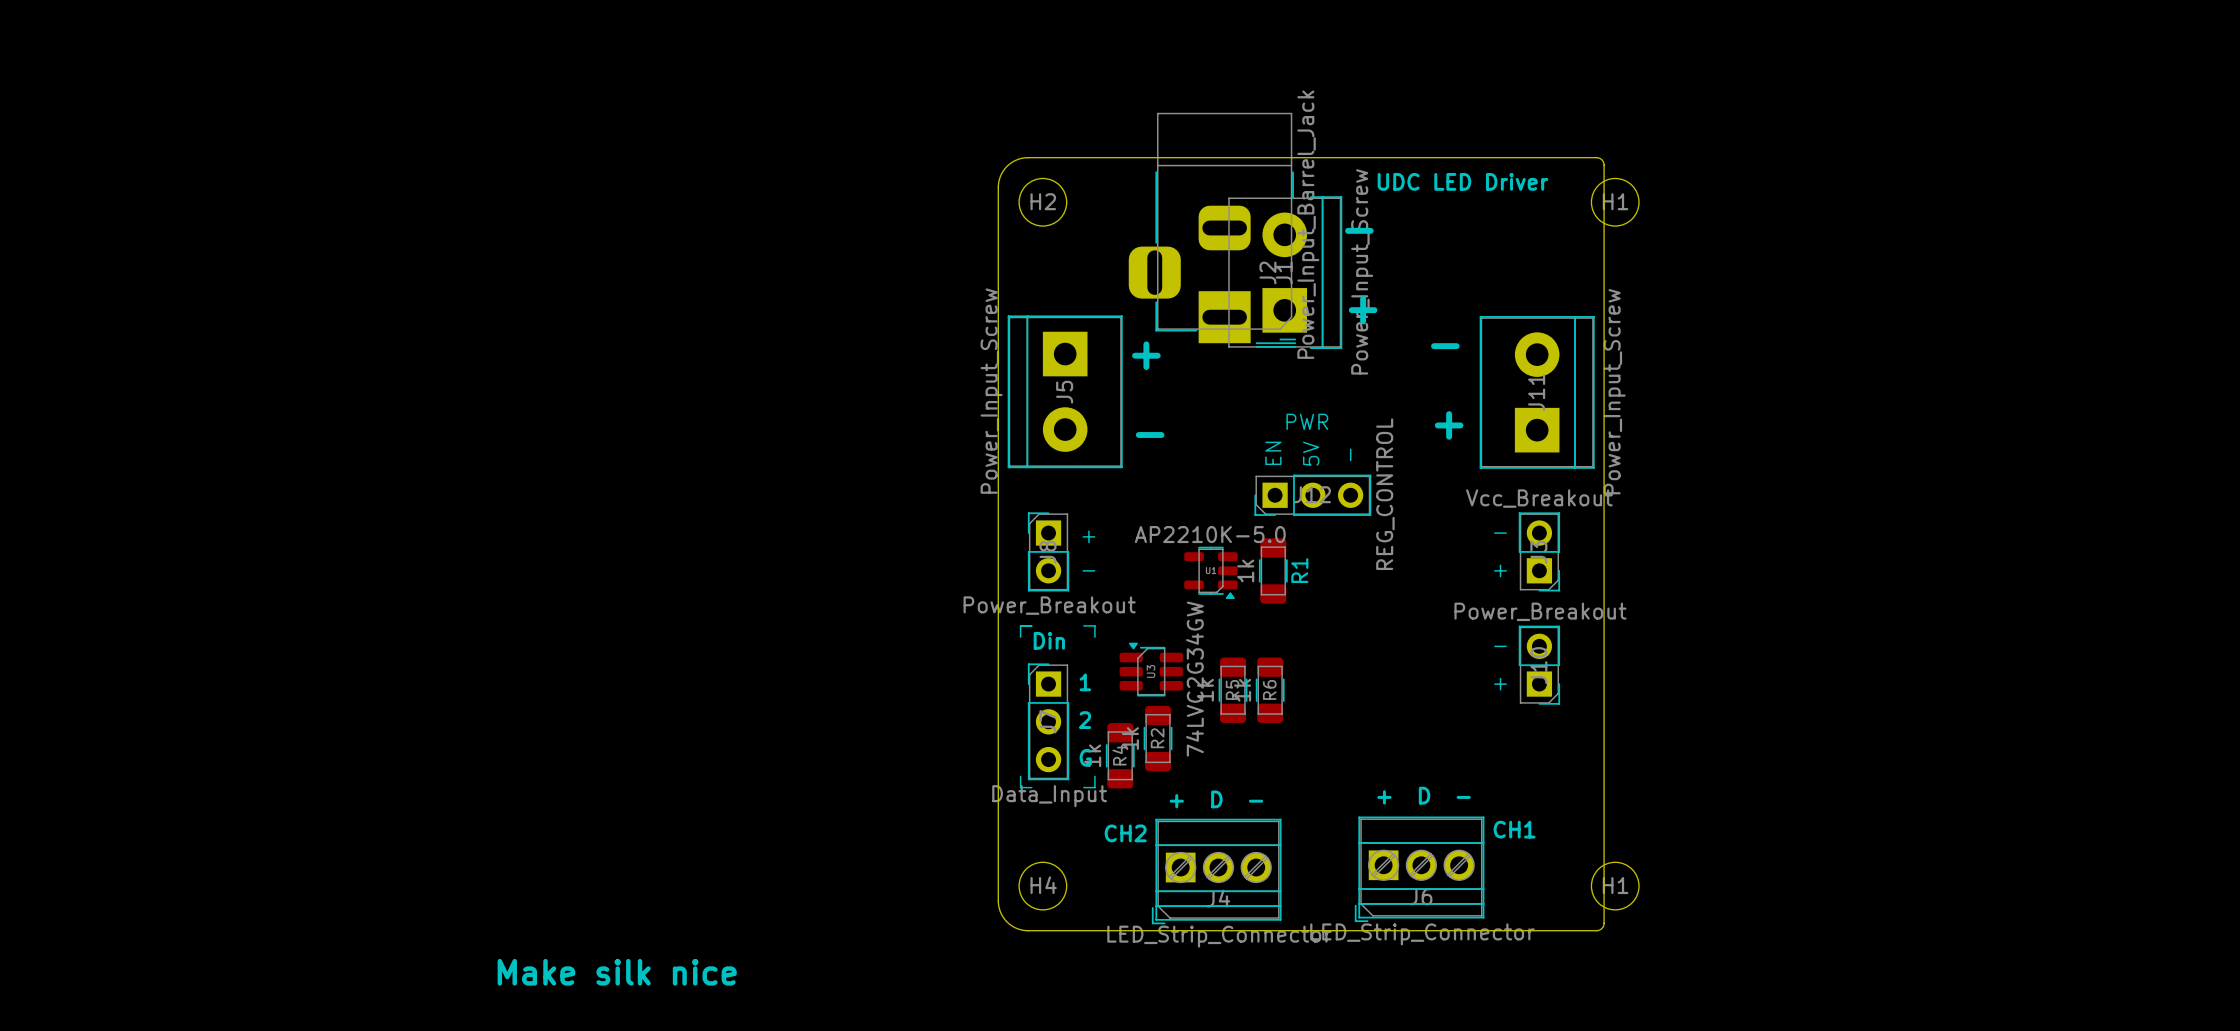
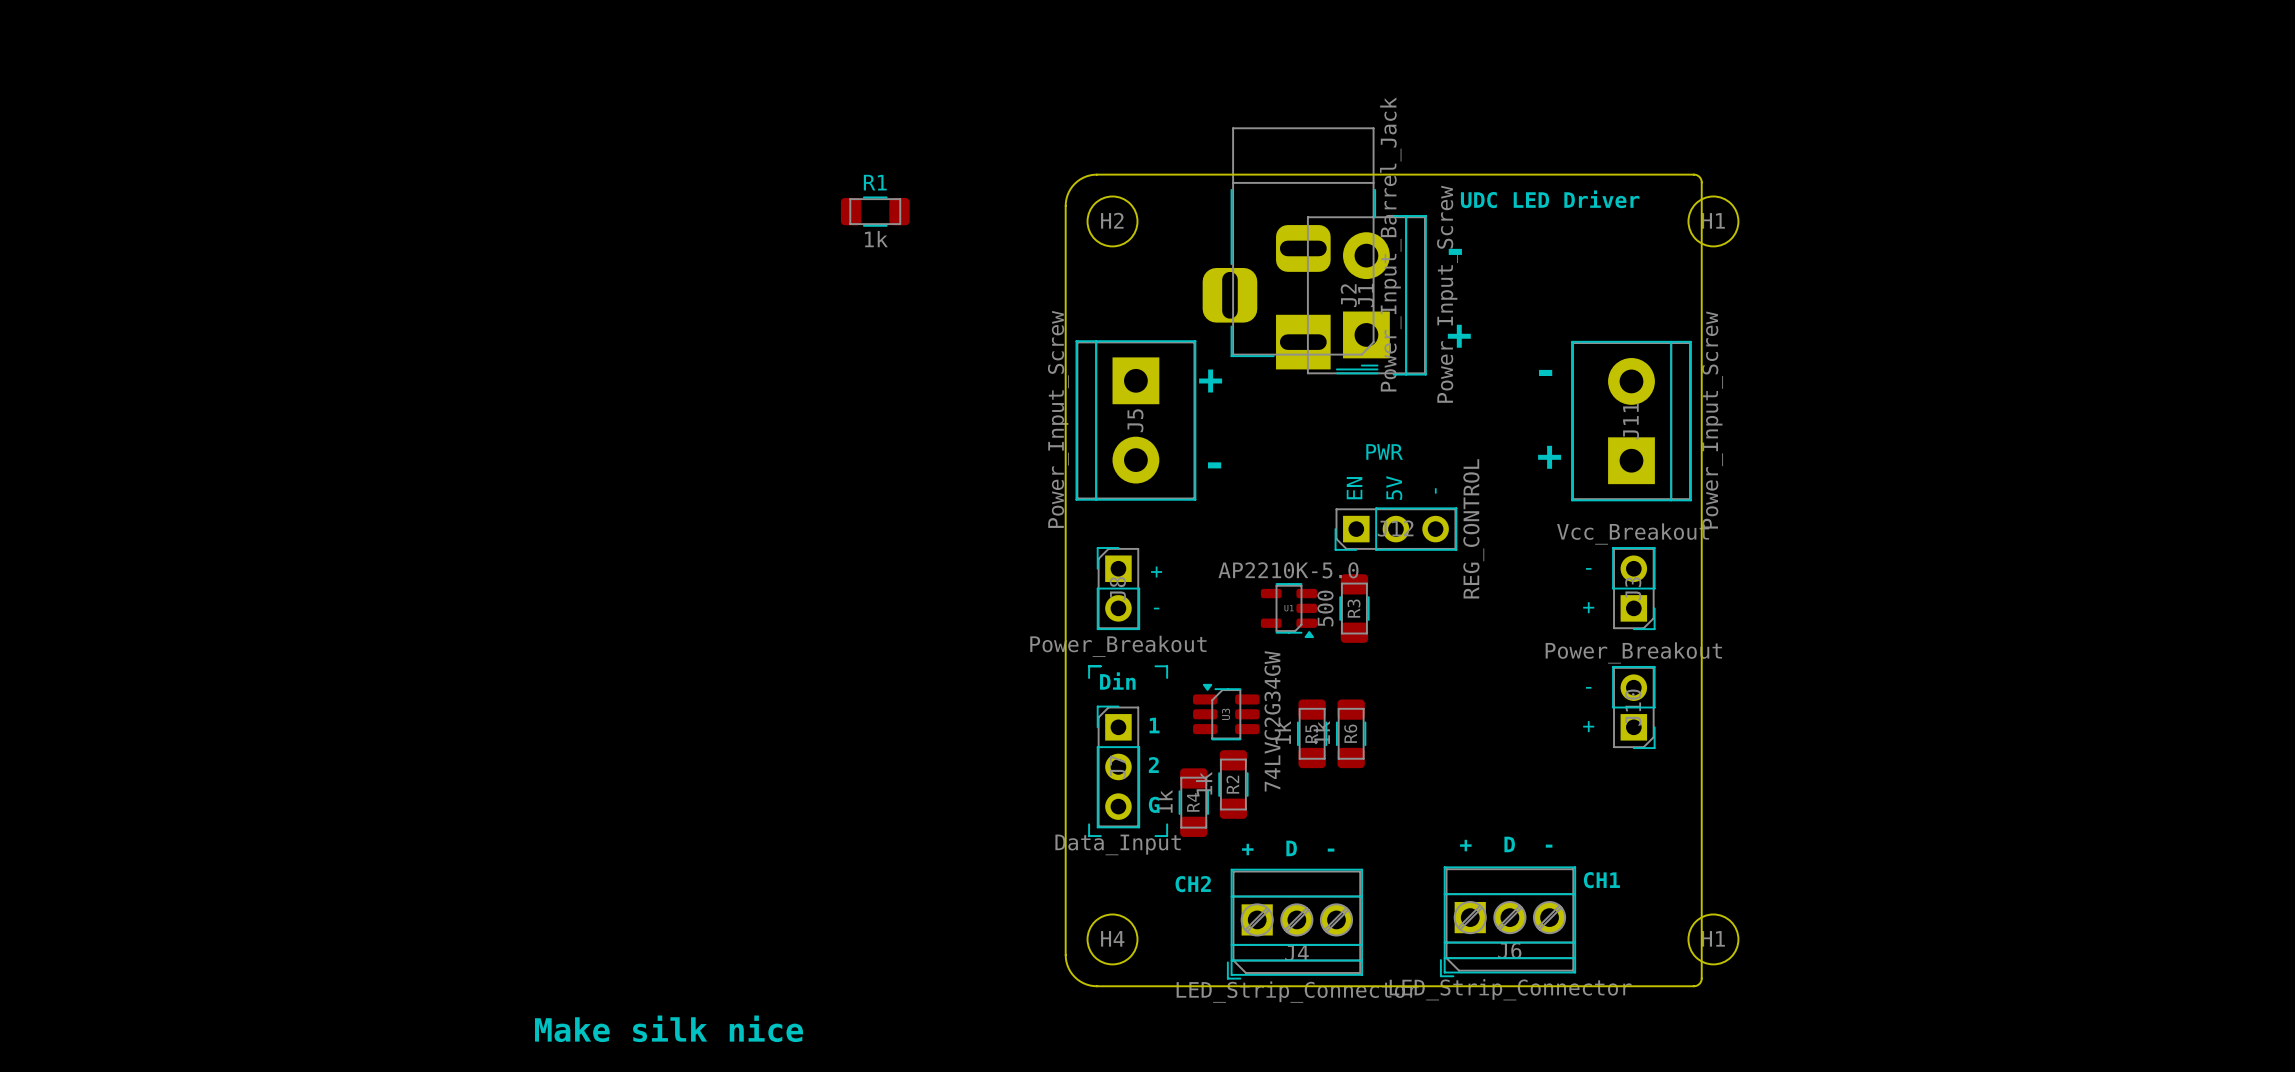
R1: none -> 1k (875, 211)
R1 value: 1k (1245, 570) -> 500 (1325, 608)
R1 name: R1 (1299, 570) -> R3 (1353, 608)

